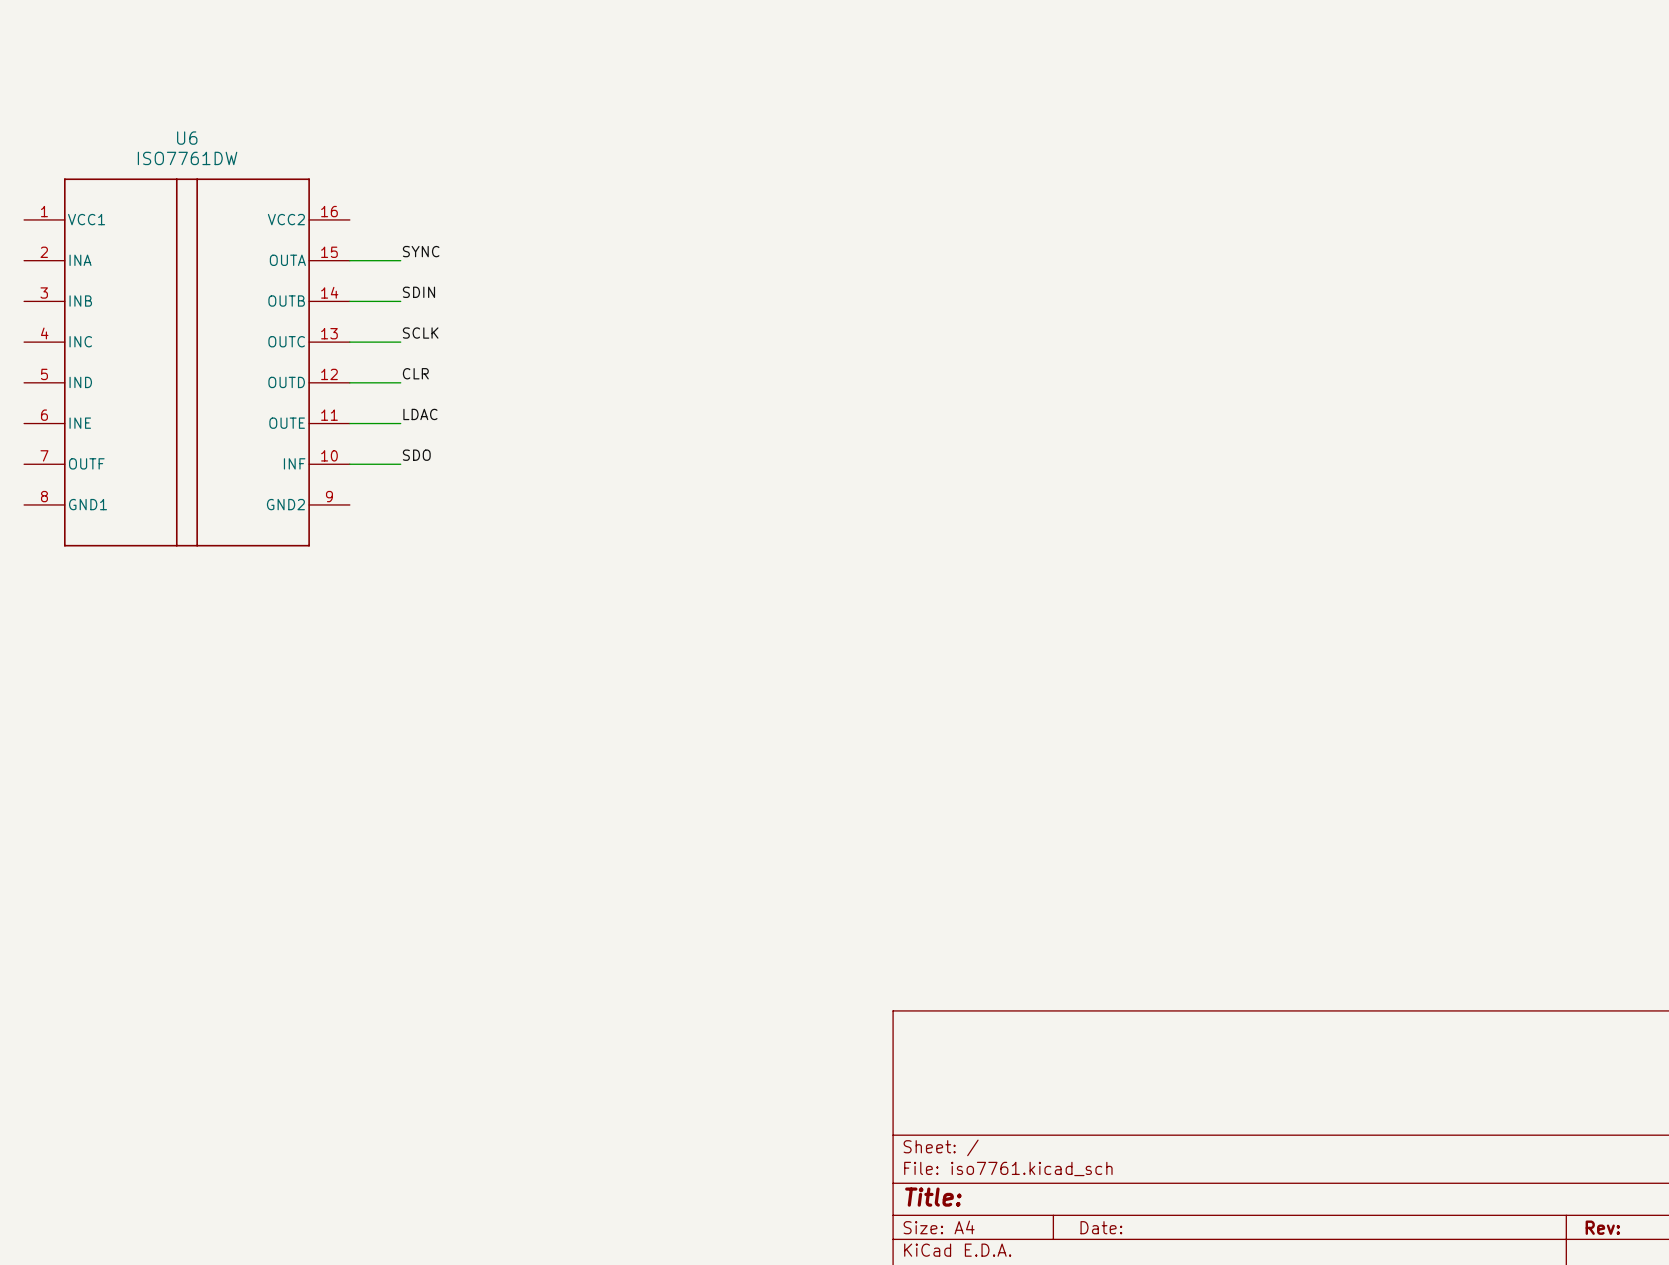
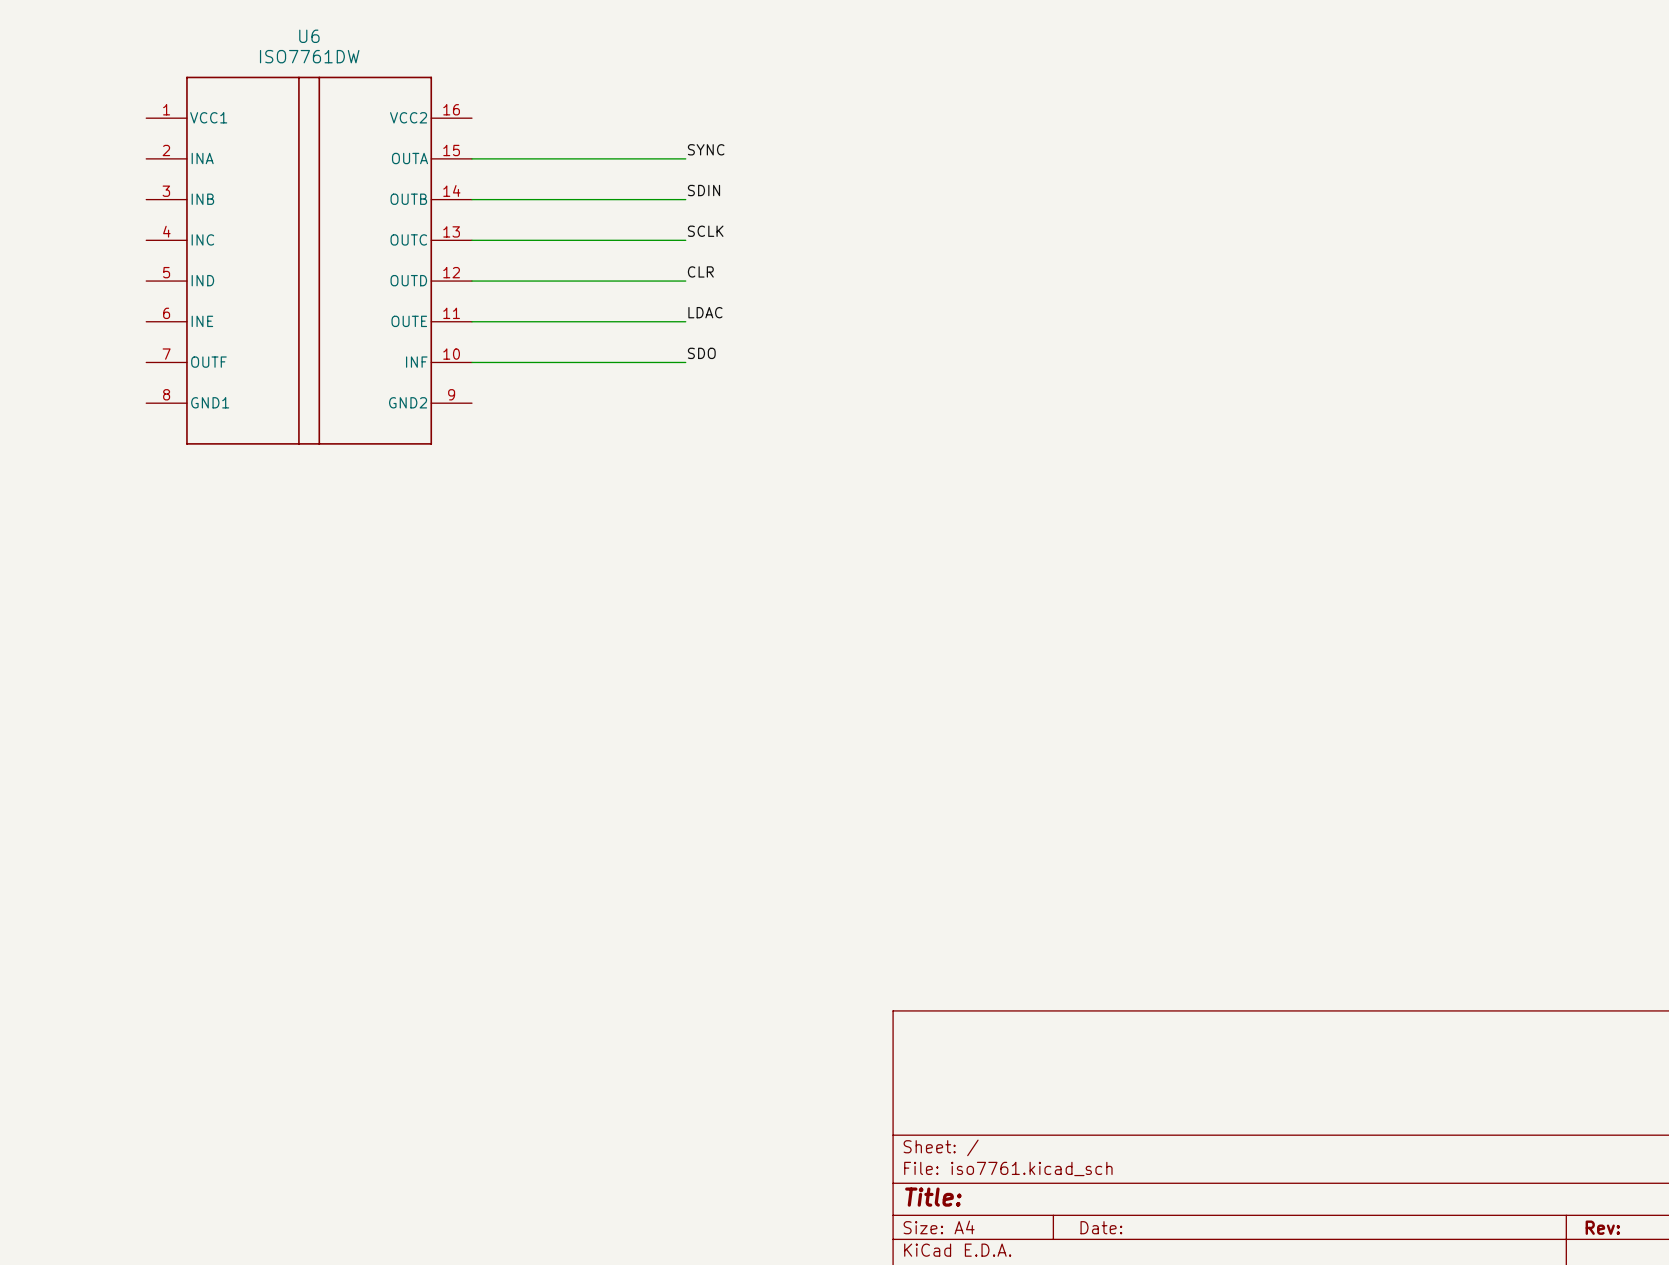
label: none -> SYNC (706, 149)
wire: none -> (471, 158) (685, 158)
label: none -> SDIN (703, 190)
wire: none -> (471, 199) (685, 199)
label: none -> SCLK (705, 231)
wire: none -> (471, 240) (685, 240)
label: SYNC (421, 251) -> none
wire: (349, 260) (400, 260) -> none
label: none -> CLR (700, 271)
wire: none -> (471, 281) (685, 281)
label: SDIN (418, 292) -> none
wire: (349, 301) (400, 301) -> none
label: none -> LDAC (705, 312)
wire: none -> (471, 321) (685, 321)
label: SCLK (420, 333) -> none
wire: (349, 342) (400, 342) -> none
label: none -> SDO (701, 353)
U6 position: (186, 362) -> (309, 260)
wire: none -> (471, 362) (685, 362)
label: CLR (415, 373) -> none
wire: (349, 382) (400, 382) -> none
label: LDAC (420, 414) -> none
wire: (349, 423) (400, 423) -> none
label: SDO (416, 455) -> none
wire: (349, 464) (400, 464) -> none

